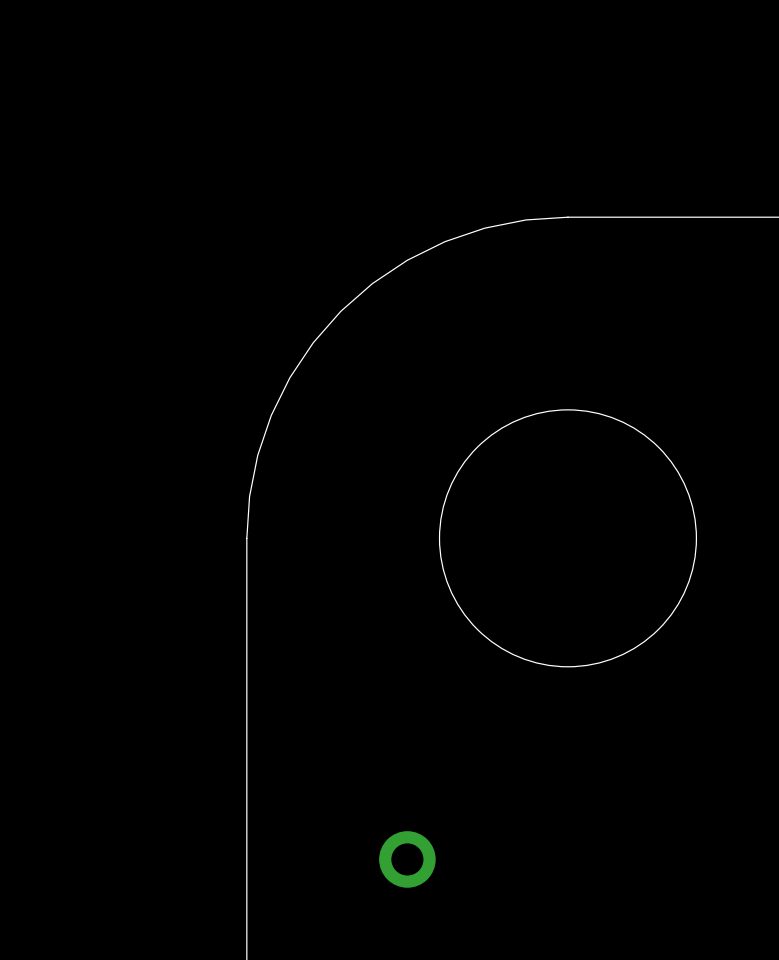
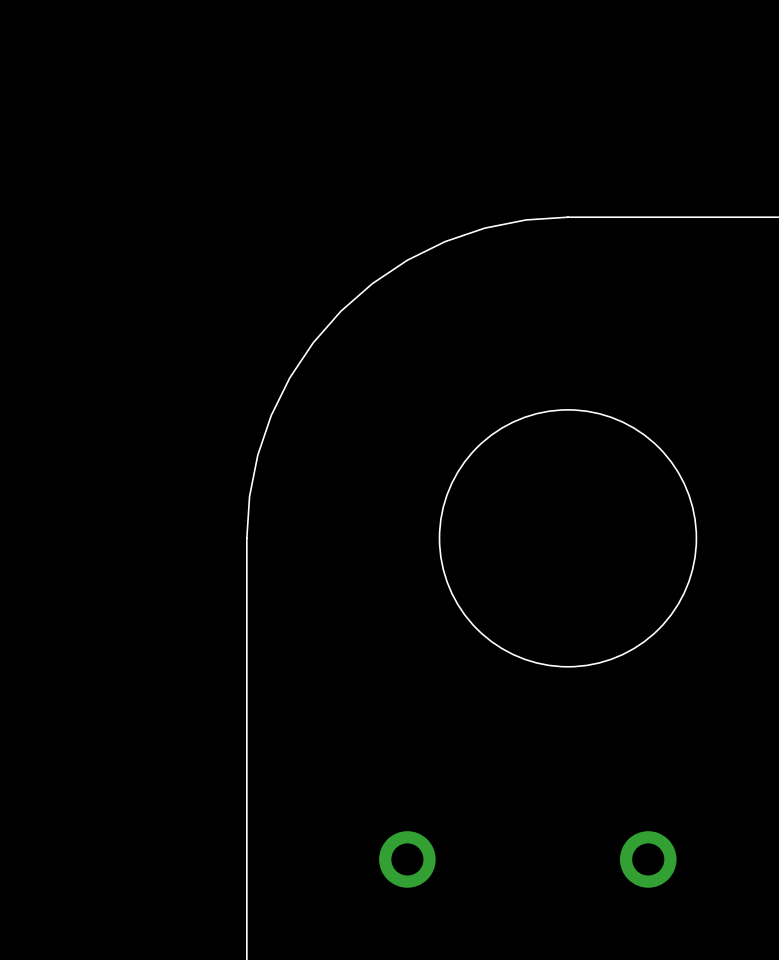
via: none -> (648, 859)

